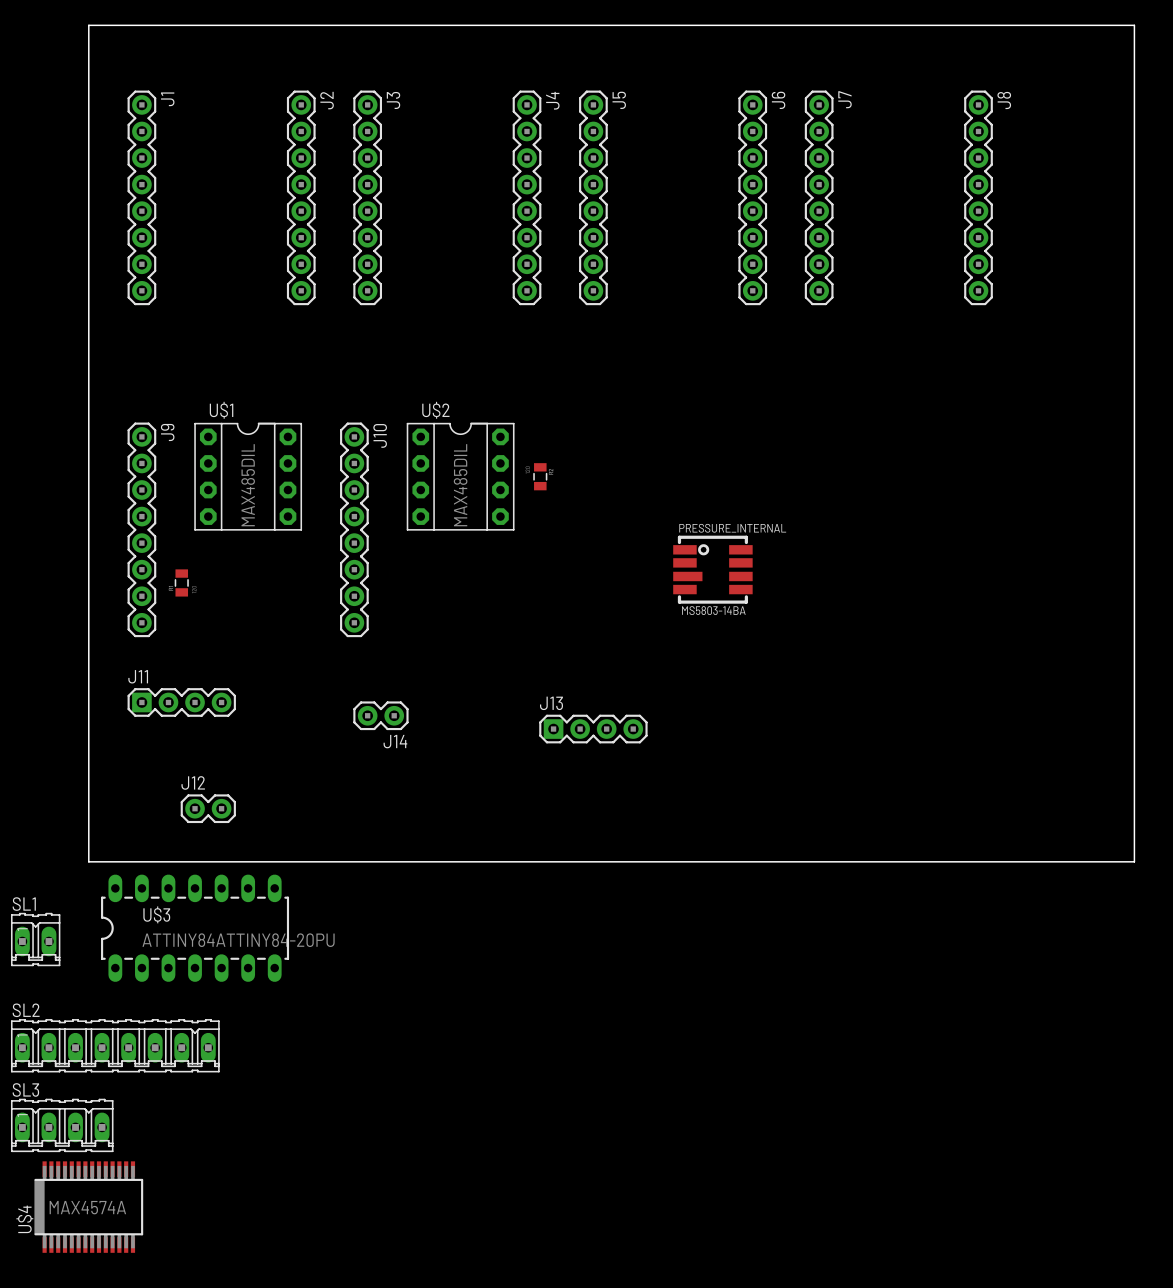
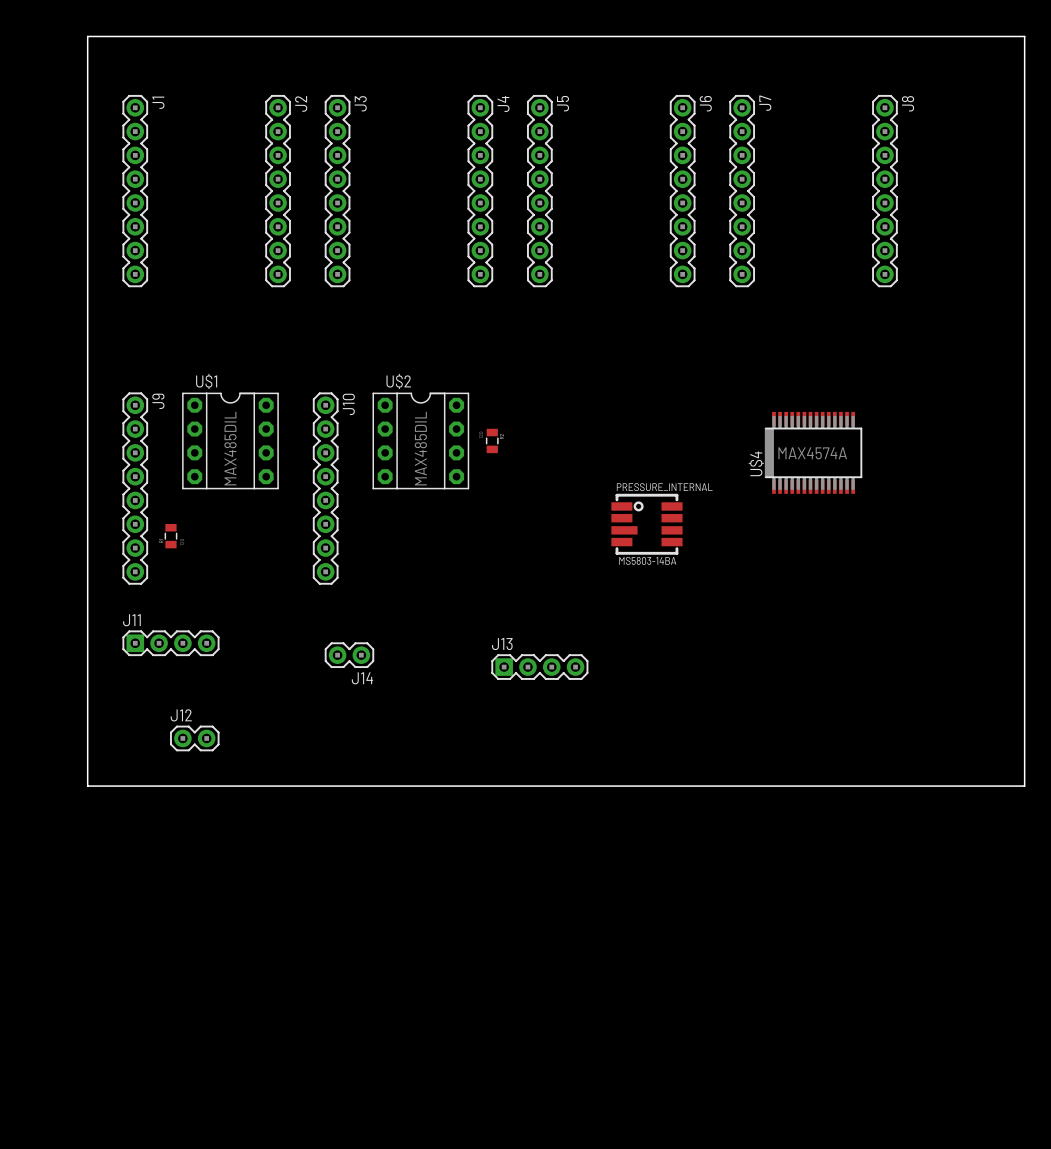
U$3: ATTINY84ATTINY84-20PU (195, 928) -> none
SL1: (35, 939) -> none
SL2: (115, 1045) -> none
SL3: (62, 1125) -> none
U$4 position: (88, 1207) -> (813, 452)

